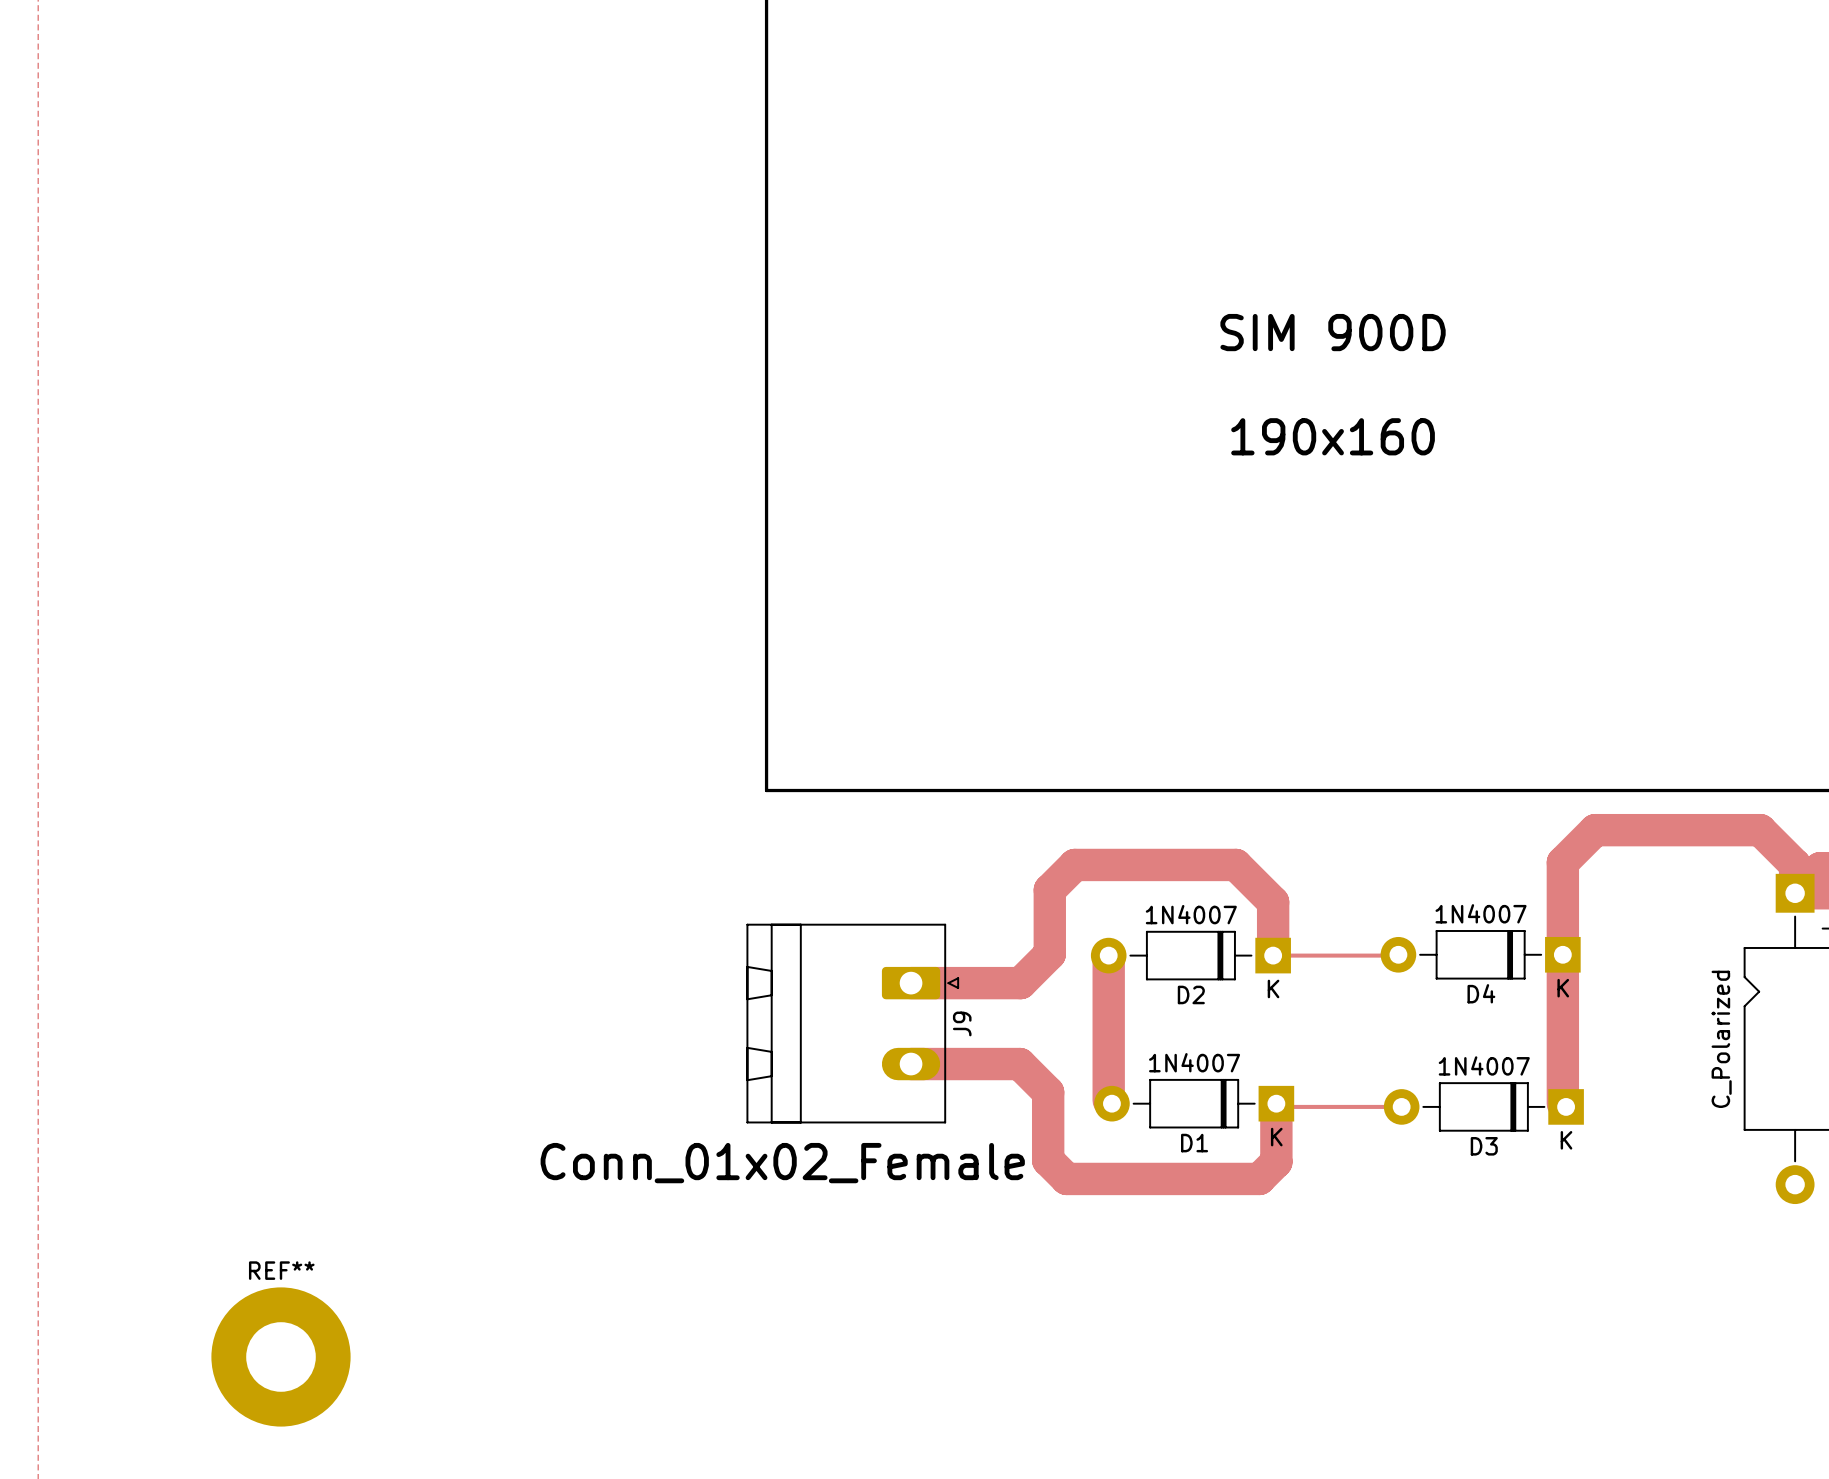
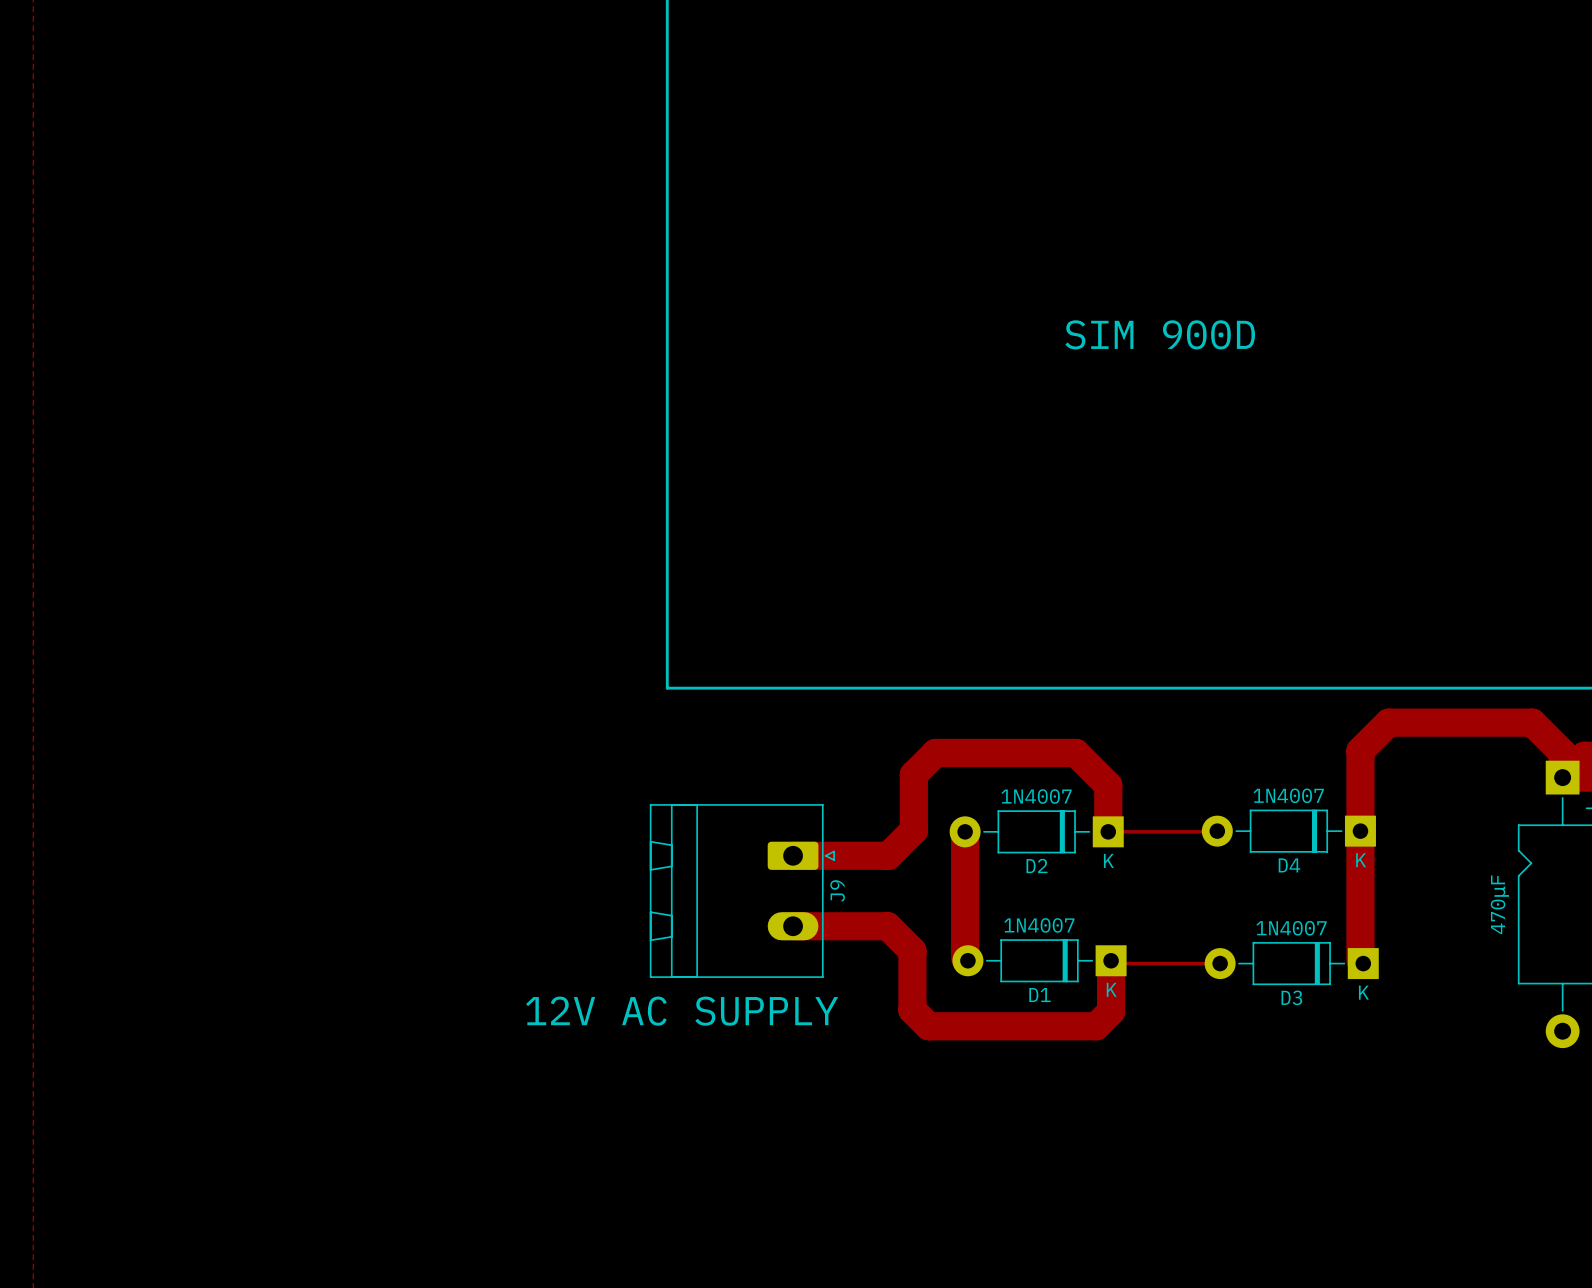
text position: SIM 900D (1333, 332) -> SIM 900D (1160, 334)
text: 190x160 (1333, 436) -> none
part value: C_Polarized (1721, 1039) -> 470μF (1499, 904)
J9 value: Conn_01x02_Female (782, 1163) -> 12V AC SUPPLY (682, 1011)
REF**: (281, 1356) -> none

